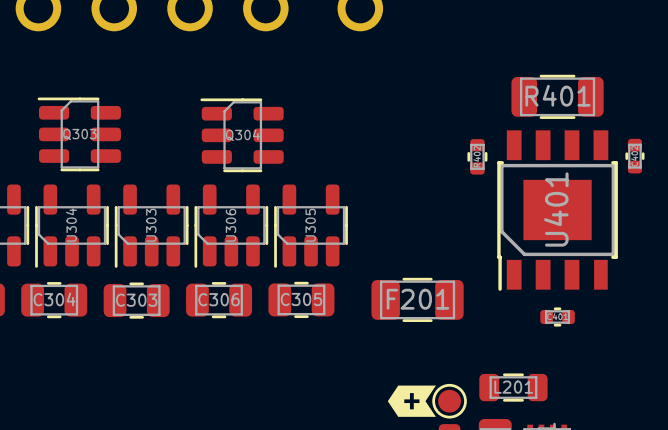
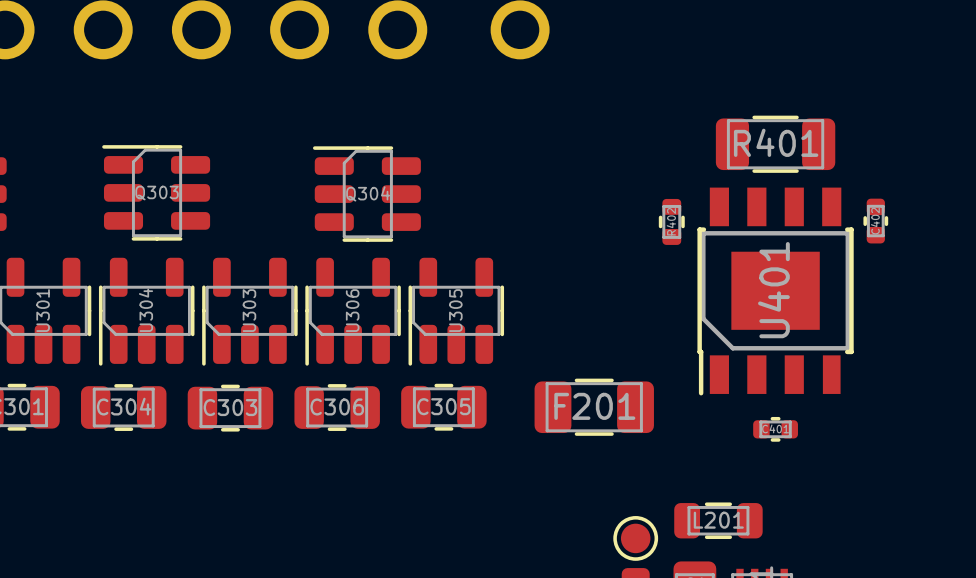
drawing: [387, 385, 436, 417] -> none

